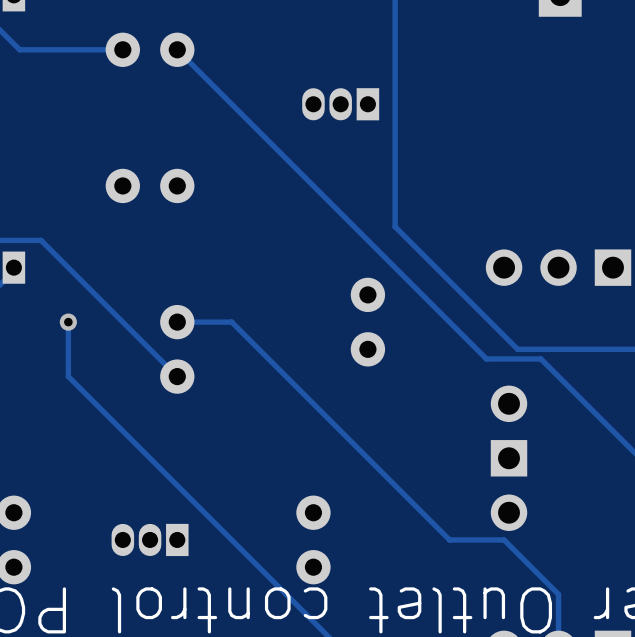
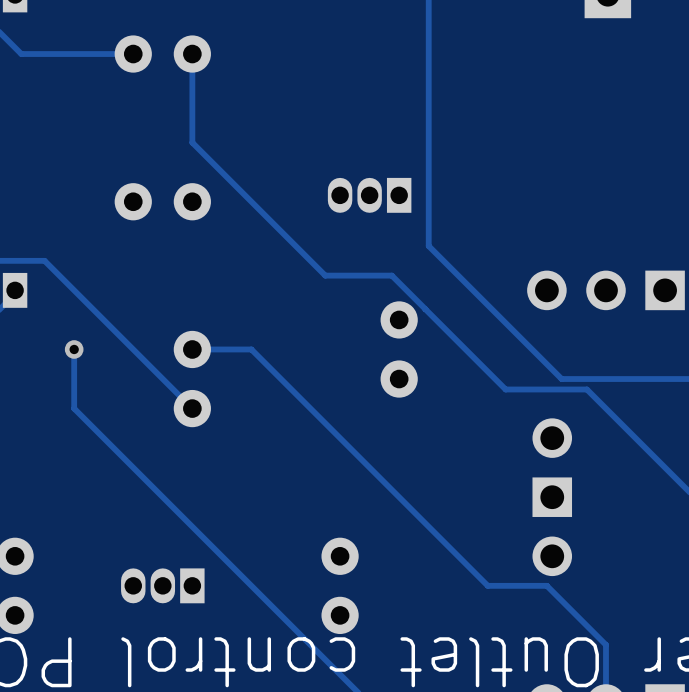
track: (177, 49) (486, 358) -> (192, 54) (192, 142) (325, 275) (391, 275) (425, 309)
part position: (340, 104) -> (369, 195)
track: none -> (425, 309) (505, 389) (527, 389)

